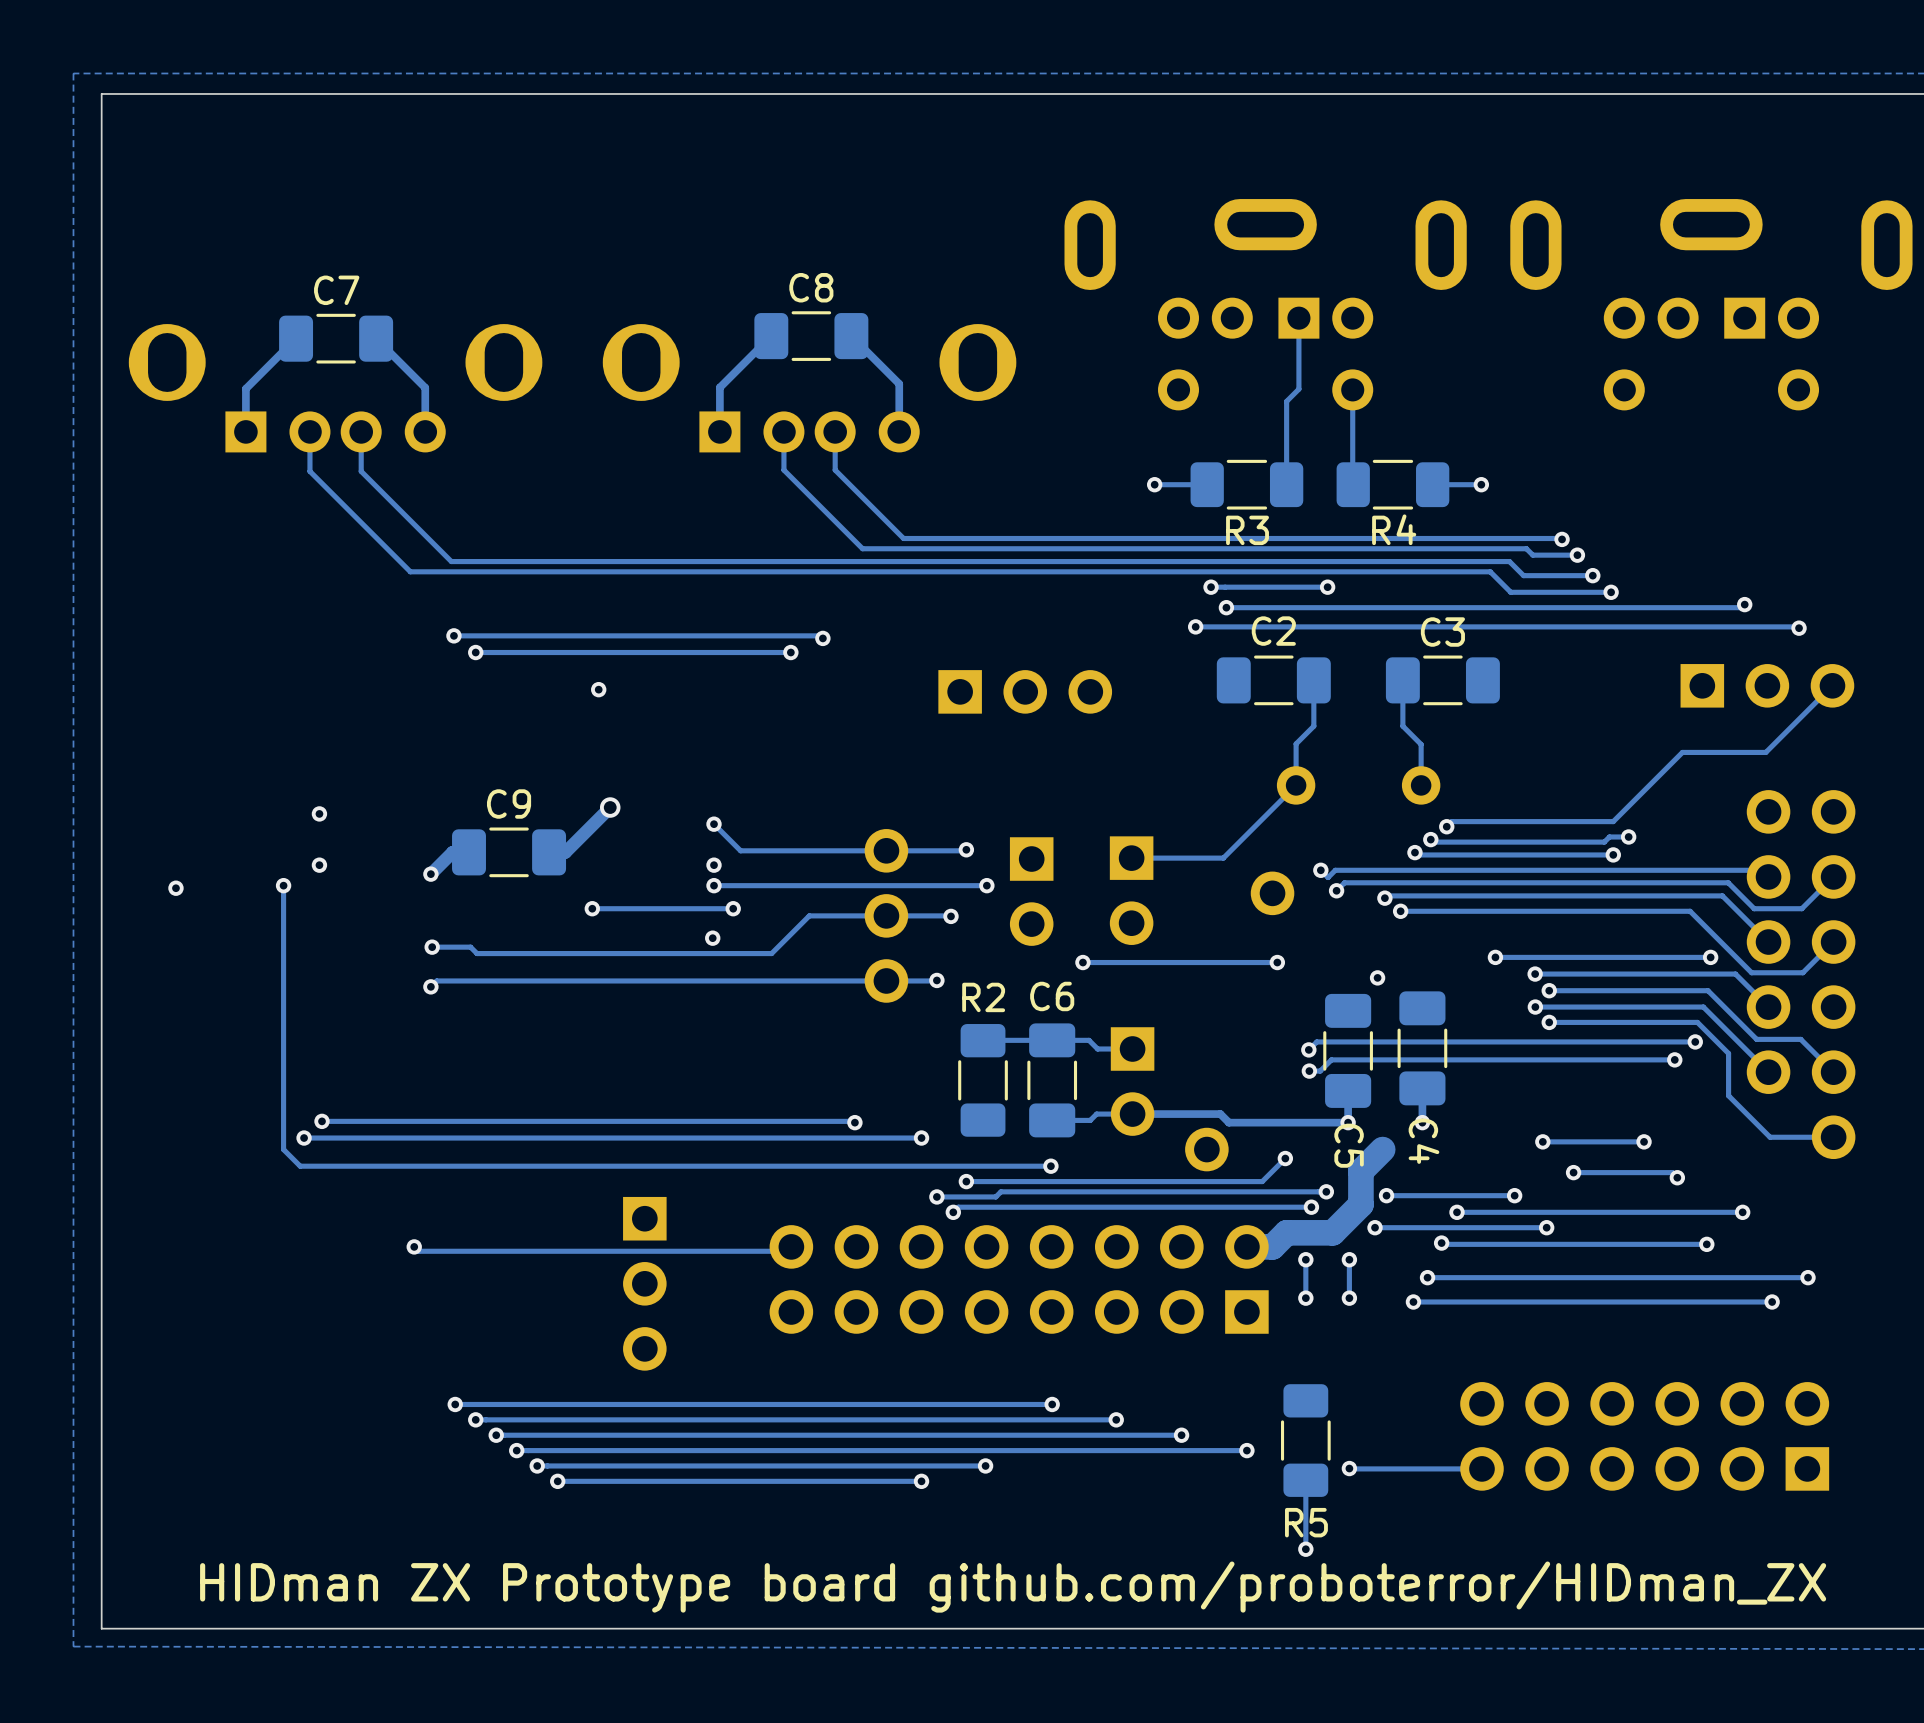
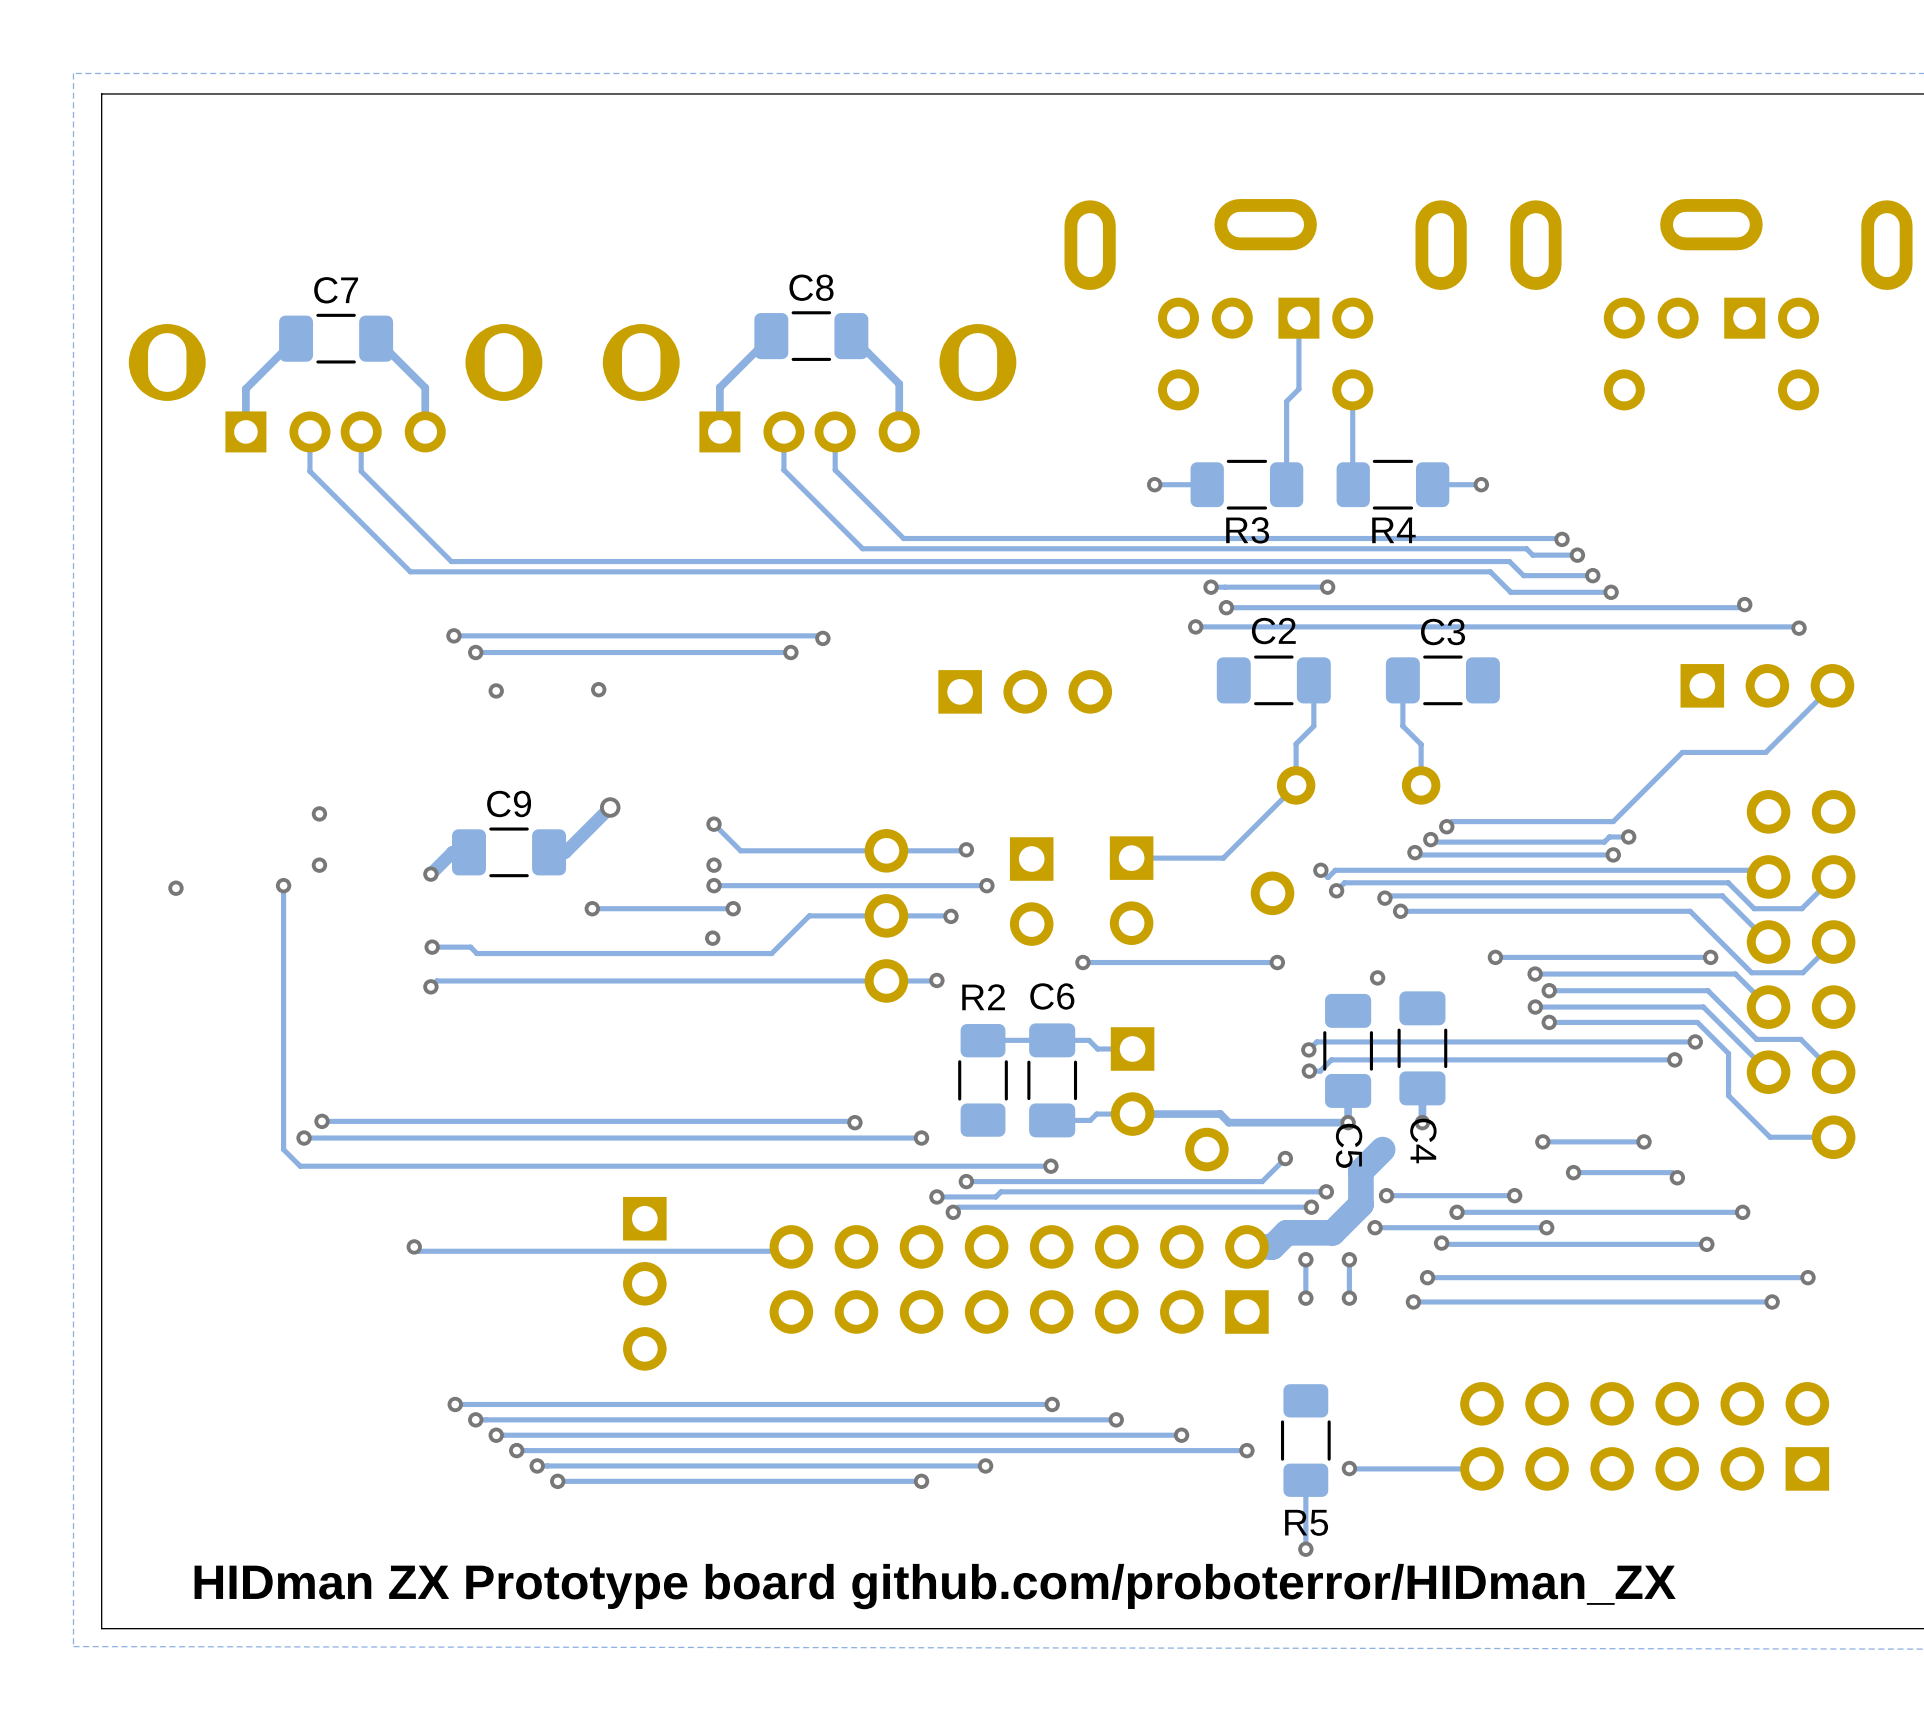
via: none -> (496, 690)

